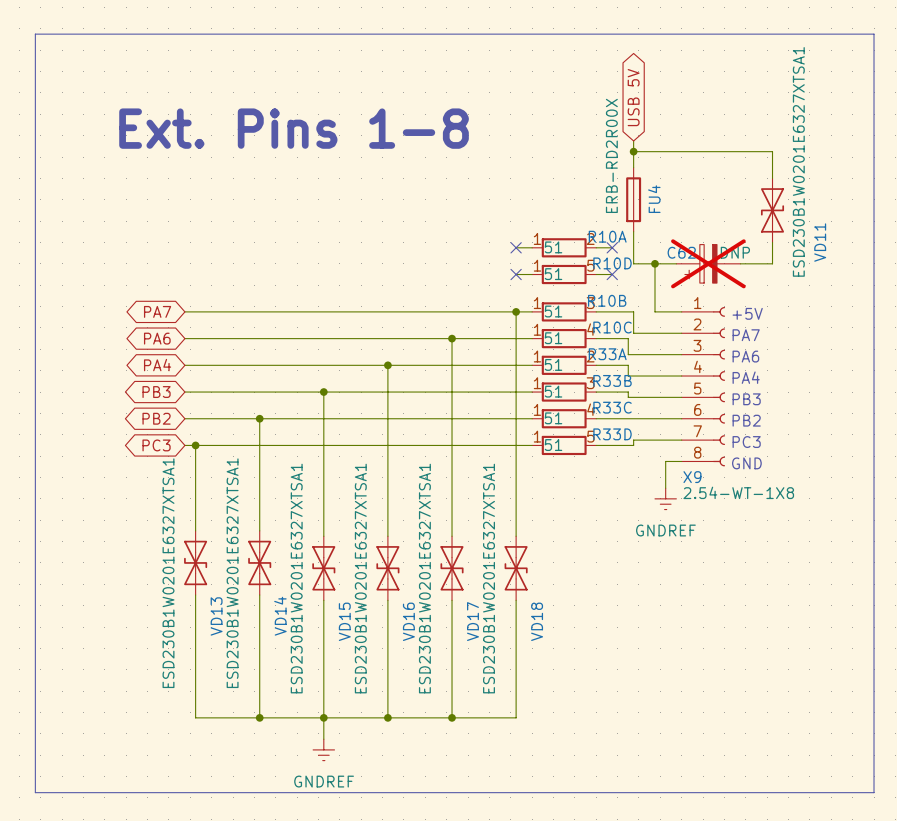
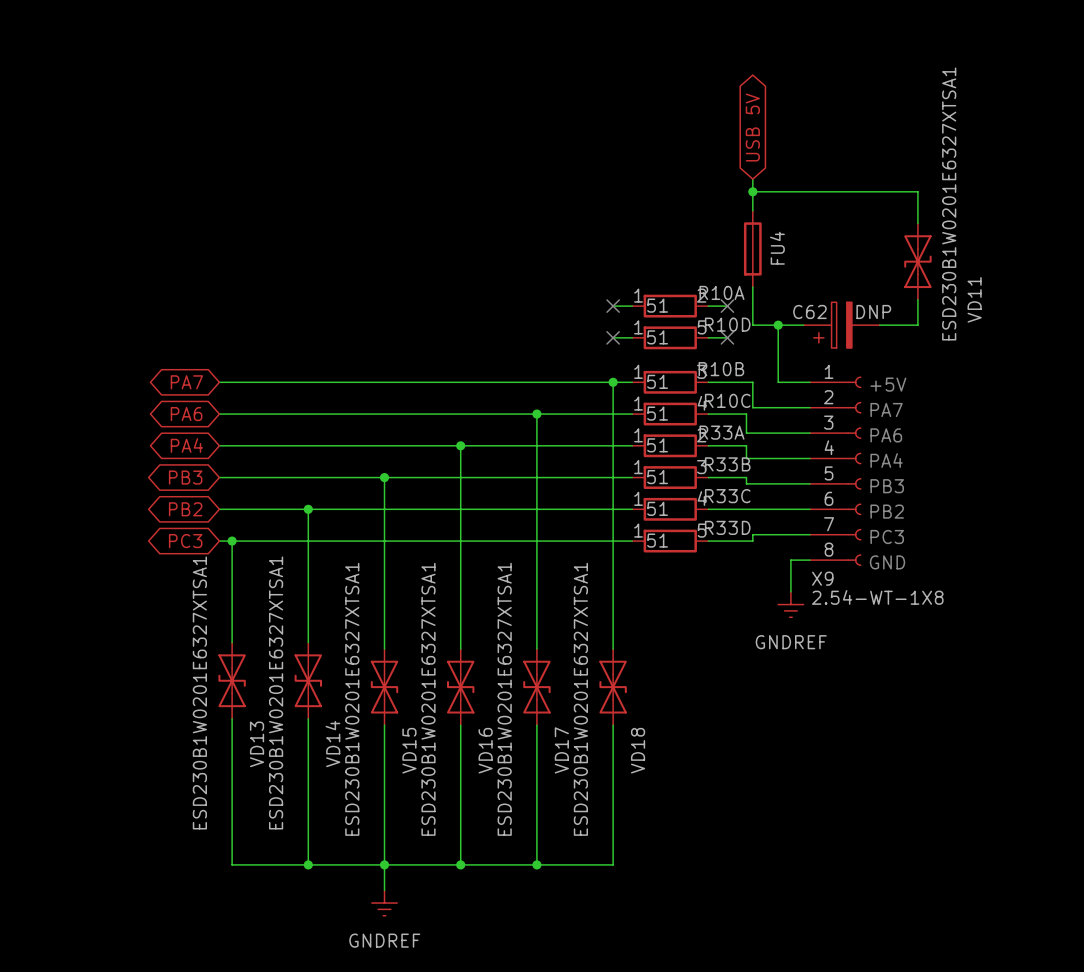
line: (35, 34) (874, 34) (874, 792) (35, 792) (35, 34) -> none
text: Ext. Pins 1-8 (294, 128) -> none
FU4 value: ERB-RD2R00X (611, 155) -> none
C62 do-not-place cross: (708, 263) -> none

